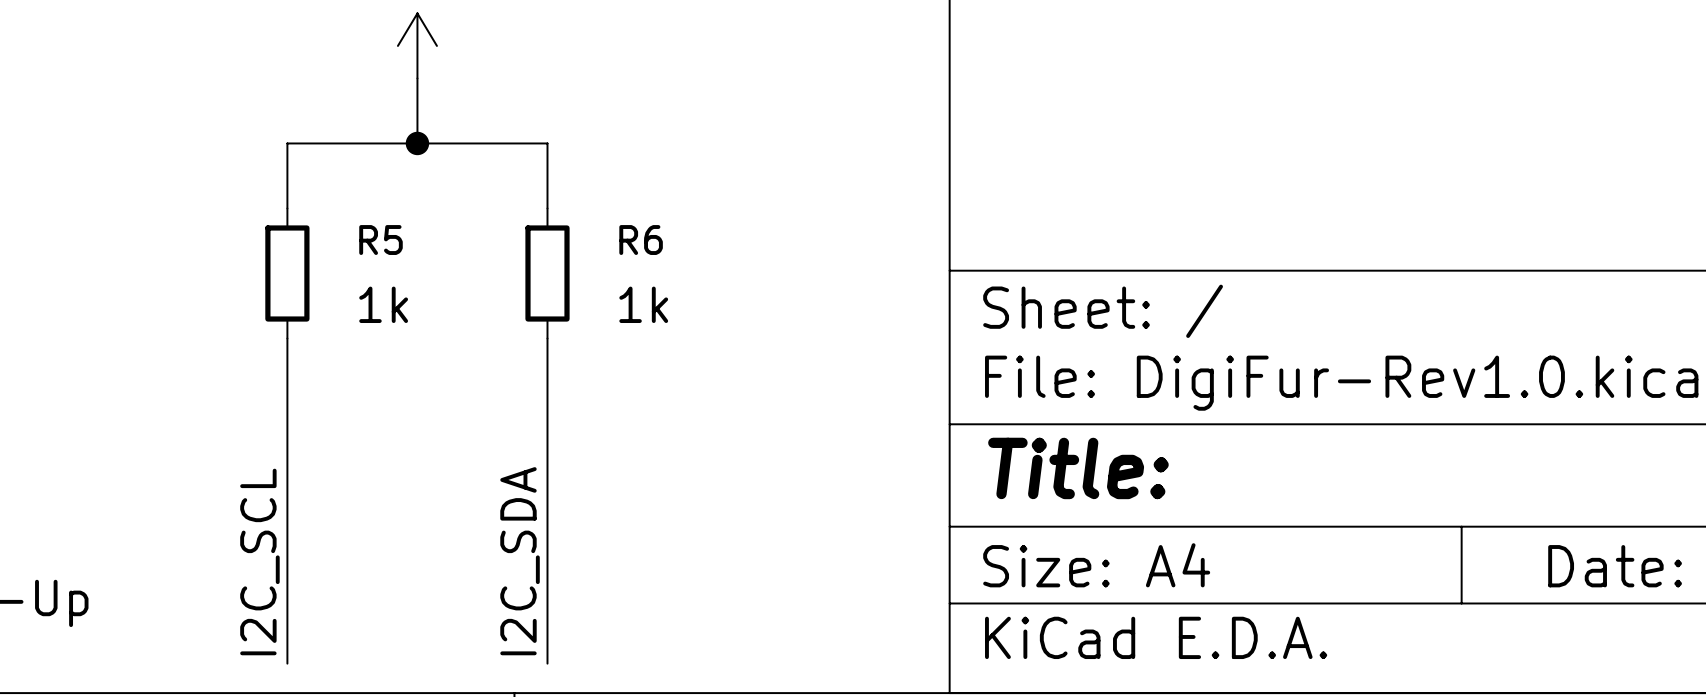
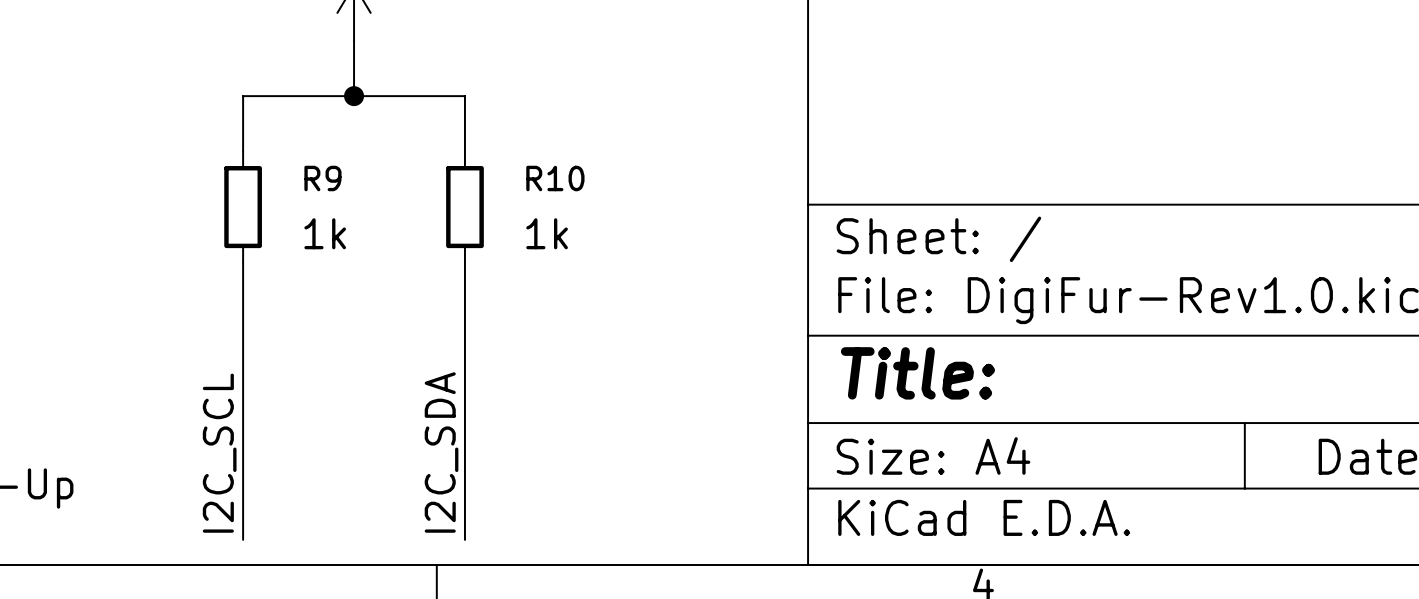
R5 name: R5 (381, 240) -> R9 (322, 178)
R6 name: R6 (641, 240) -> R10 (555, 178)

